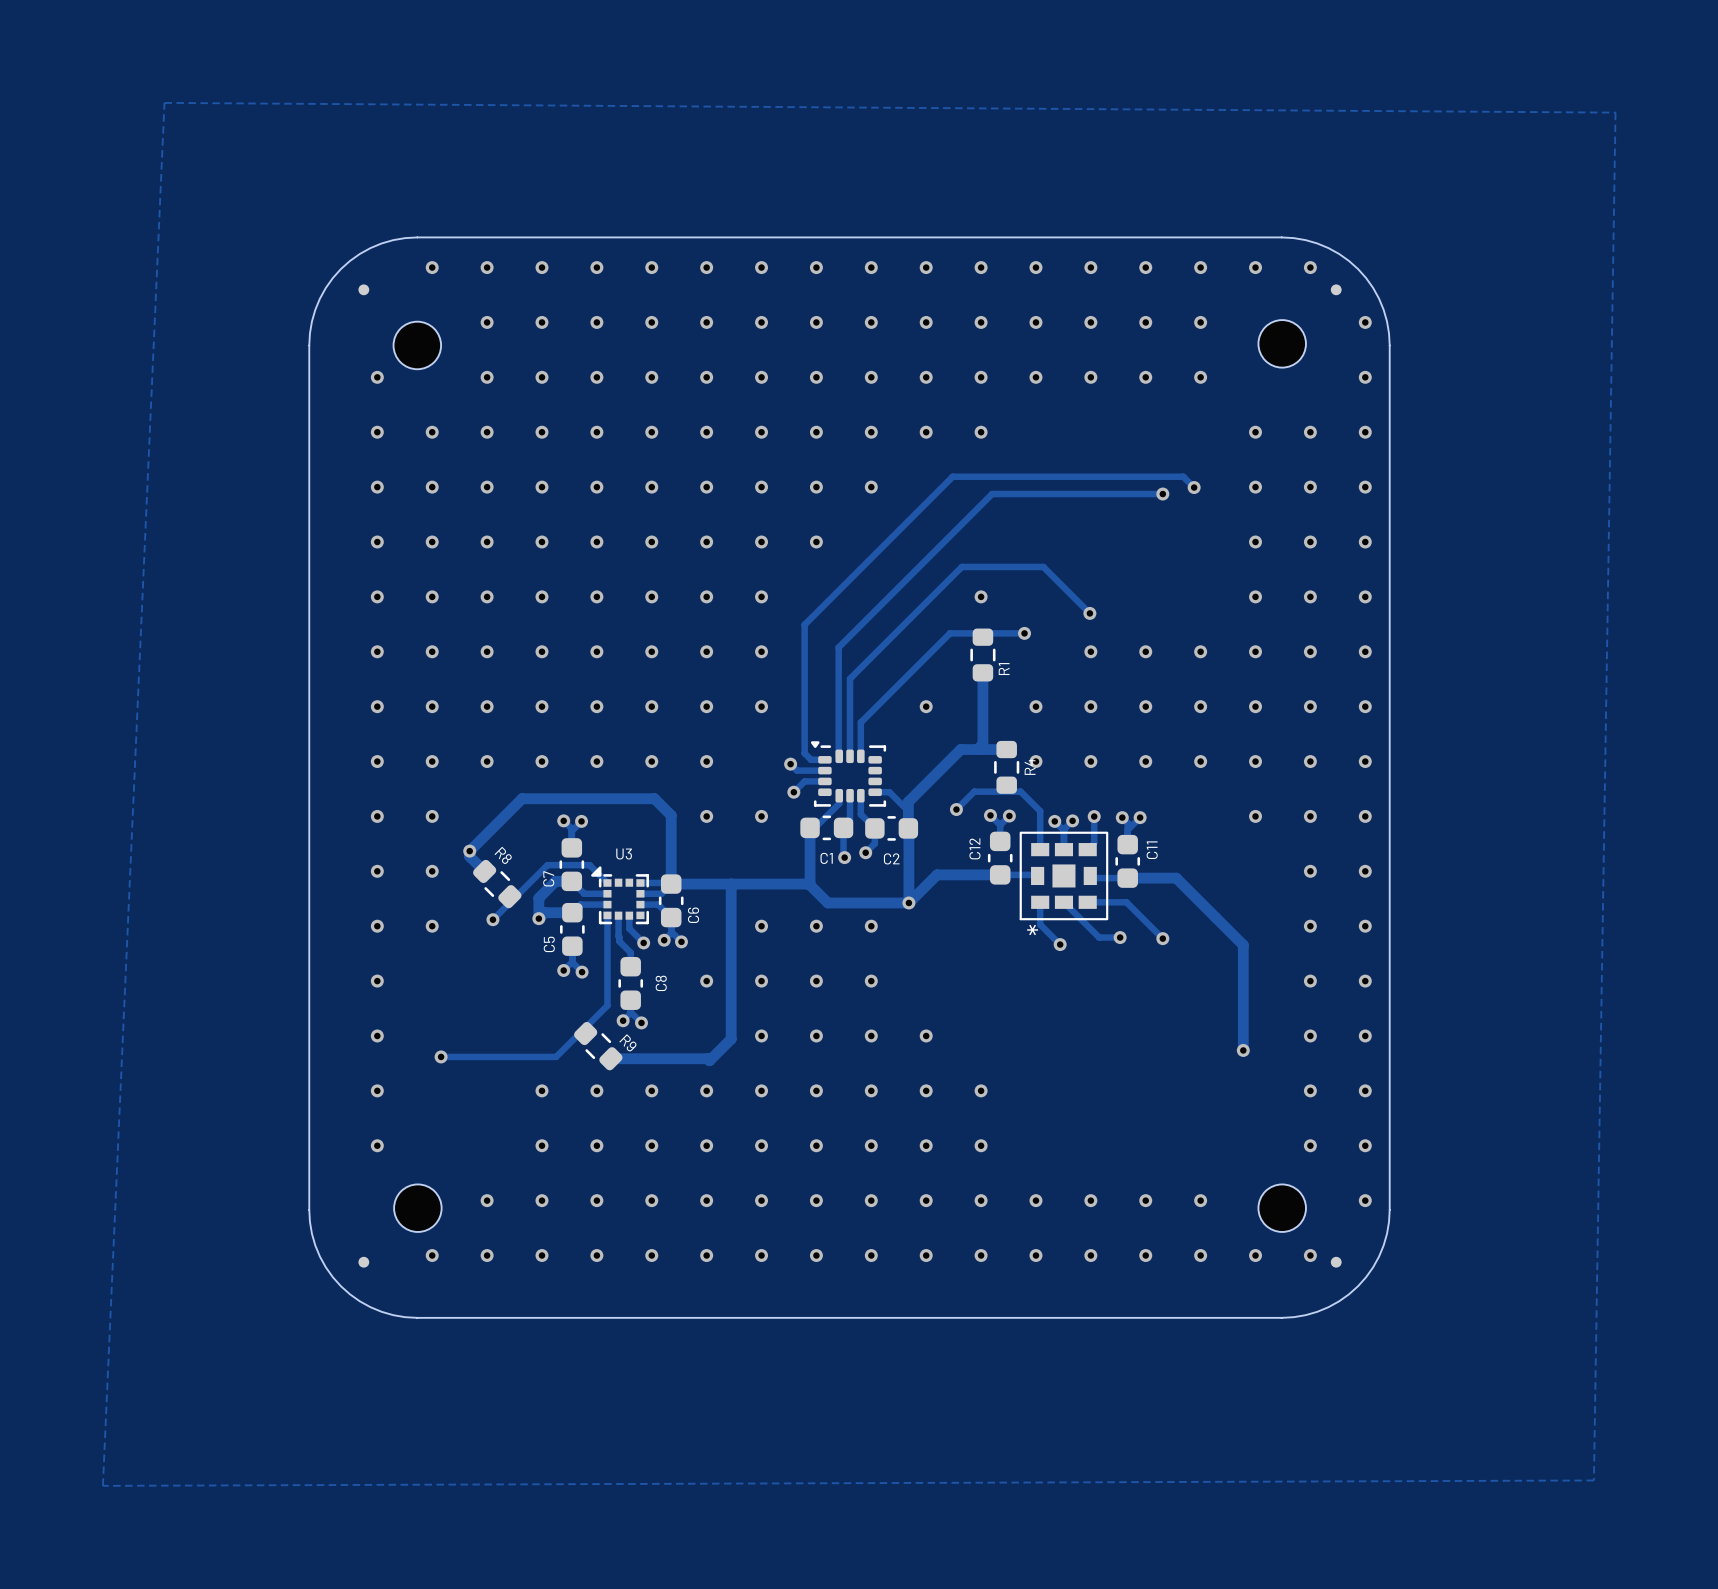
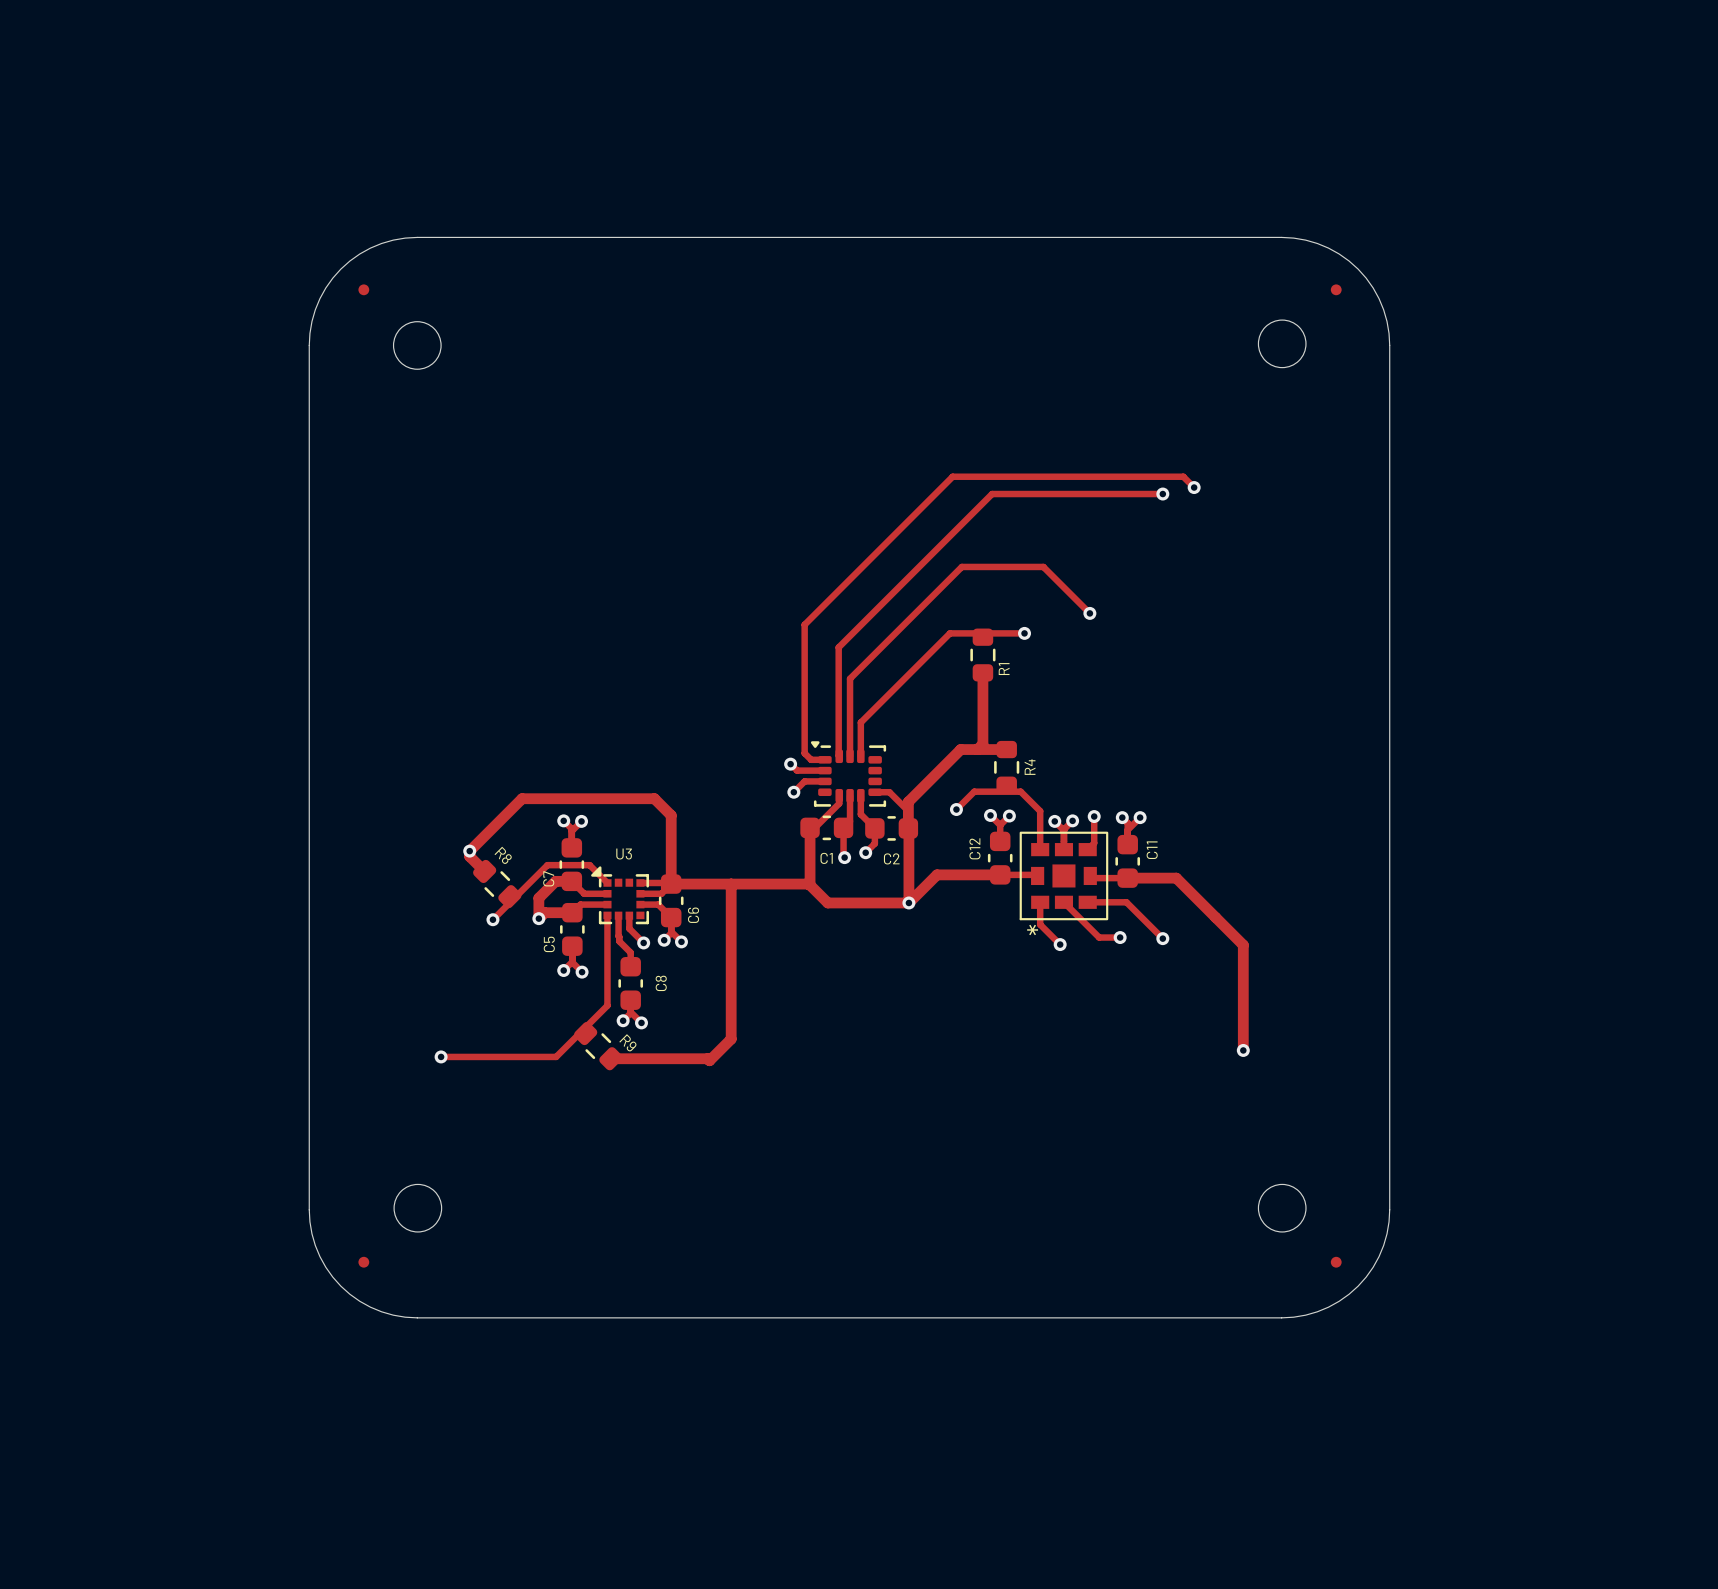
zone outline: (164, 102) (1615, 112) (1593, 1480) (102, 1485) (164, 102) -> none
via: (432, 267) -> none
via: (487, 267) -> none
via: (541, 267) -> none
via: (596, 267) -> none
via: (651, 267) -> none
via: (706, 267) -> none
via: (761, 267) -> none
via: (816, 267) -> none
via: (871, 267) -> none
via: (926, 267) -> none
via: (981, 267) -> none
via: (1035, 267) -> none
via: (1090, 267) -> none
via: (1145, 267) -> none
via: (1200, 267) -> none
via: (1255, 267) -> none
via: (1310, 267) -> none
via: (487, 322) -> none
via: (541, 322) -> none
via: (596, 322) -> none
via: (651, 322) -> none
via: (706, 322) -> none
via: (761, 322) -> none
via: (816, 322) -> none
via: (871, 322) -> none
via: (926, 322) -> none
via: (981, 322) -> none
via: (1035, 322) -> none
via: (1090, 322) -> none
via: (1145, 322) -> none
via: (1200, 322) -> none
via: (1365, 322) -> none
via: (377, 377) -> none
via: (487, 377) -> none
via: (541, 377) -> none
via: (596, 377) -> none
via: (651, 377) -> none
via: (706, 377) -> none
via: (761, 377) -> none
via: (816, 377) -> none
via: (871, 377) -> none
via: (926, 377) -> none
via: (981, 377) -> none
via: (1035, 377) -> none
via: (1090, 377) -> none
via: (1145, 377) -> none
via: (1200, 377) -> none
via: (1365, 377) -> none
via: (377, 432) -> none
via: (432, 432) -> none
via: (487, 432) -> none
via: (541, 432) -> none
via: (596, 432) -> none
via: (651, 432) -> none
via: (706, 432) -> none
via: (761, 432) -> none
via: (816, 432) -> none
via: (871, 432) -> none
via: (926, 432) -> none
via: (981, 432) -> none
via: (1255, 432) -> none
via: (1310, 432) -> none
via: (1365, 432) -> none
via: (377, 487) -> none
via: (432, 487) -> none
via: (487, 487) -> none
via: (541, 487) -> none
via: (596, 487) -> none
via: (651, 487) -> none
via: (706, 487) -> none
via: (761, 487) -> none
via: (816, 487) -> none
via: (871, 487) -> none
via: (1255, 487) -> none
via: (1310, 487) -> none
via: (1365, 487) -> none
via: (377, 541) -> none
via: (432, 541) -> none
via: (487, 541) -> none
via: (541, 541) -> none
via: (596, 541) -> none
via: (651, 541) -> none
via: (706, 541) -> none
via: (761, 541) -> none
via: (816, 541) -> none
via: (1255, 541) -> none
via: (1310, 541) -> none
via: (1365, 541) -> none
via: (377, 596) -> none
via: (432, 596) -> none
via: (487, 596) -> none
via: (541, 596) -> none
via: (596, 596) -> none
via: (651, 596) -> none
via: (706, 596) -> none
via: (761, 596) -> none
via: (981, 596) -> none
via: (1255, 596) -> none
via: (1310, 596) -> none
via: (1365, 596) -> none
via: (377, 651) -> none
via: (432, 651) -> none
via: (487, 651) -> none
via: (541, 651) -> none
via: (596, 651) -> none
via: (651, 651) -> none
via: (706, 651) -> none
via: (761, 651) -> none
via: (1090, 651) -> none
via: (1145, 651) -> none
via: (1200, 651) -> none
via: (1255, 651) -> none
via: (1310, 651) -> none
via: (1365, 651) -> none
via: (377, 706) -> none
via: (432, 706) -> none
via: (487, 706) -> none
via: (541, 706) -> none
via: (596, 706) -> none
via: (651, 706) -> none
via: (706, 706) -> none
via: (761, 706) -> none
via: (926, 706) -> none
via: (1035, 706) -> none
via: (1090, 706) -> none
via: (1145, 706) -> none
via: (1200, 706) -> none
via: (1255, 706) -> none
via: (1310, 706) -> none
via: (1365, 706) -> none
via: (377, 761) -> none
via: (432, 761) -> none
via: (487, 761) -> none
via: (541, 761) -> none
via: (596, 761) -> none
via: (651, 761) -> none
via: (706, 761) -> none
via: (1035, 761) -> none
via: (1090, 761) -> none
via: (1145, 761) -> none
via: (1200, 761) -> none
via: (1255, 761) -> none
via: (1310, 761) -> none
via: (1365, 761) -> none
via: (377, 816) -> none
via: (432, 816) -> none
via: (706, 816) -> none
via: (761, 816) -> none
via: (1255, 816) -> none
via: (1310, 816) -> none
via: (1365, 816) -> none
via: (377, 871) -> none
via: (432, 871) -> none
via: (1310, 871) -> none
via: (1365, 871) -> none
via: (377, 926) -> none
via: (432, 926) -> none
via: (761, 926) -> none
via: (816, 926) -> none
via: (871, 926) -> none
via: (1310, 926) -> none
via: (1365, 926) -> none
via: (377, 981) -> none
via: (706, 981) -> none
via: (761, 981) -> none
via: (816, 981) -> none
via: (871, 981) -> none
via: (1310, 981) -> none
via: (1365, 981) -> none
via: (377, 1035) -> none
via: (761, 1035) -> none
via: (816, 1035) -> none
via: (871, 1035) -> none
via: (926, 1035) -> none
via: (1310, 1035) -> none
via: (1365, 1035) -> none
via: (377, 1090) -> none
via: (541, 1090) -> none
via: (596, 1090) -> none
via: (651, 1090) -> none
via: (706, 1090) -> none
via: (761, 1090) -> none
via: (816, 1090) -> none
via: (871, 1090) -> none
via: (926, 1090) -> none
via: (981, 1090) -> none
via: (1310, 1090) -> none
via: (1365, 1090) -> none
via: (377, 1145) -> none
via: (541, 1145) -> none
via: (596, 1145) -> none
via: (651, 1145) -> none
via: (706, 1145) -> none
via: (761, 1145) -> none
via: (816, 1145) -> none
via: (871, 1145) -> none
via: (926, 1145) -> none
via: (981, 1145) -> none
via: (1310, 1145) -> none
via: (1365, 1145) -> none
via: (487, 1200) -> none
via: (541, 1200) -> none
via: (596, 1200) -> none
via: (651, 1200) -> none
via: (706, 1200) -> none
via: (761, 1200) -> none
via: (816, 1200) -> none
via: (871, 1200) -> none
via: (926, 1200) -> none
via: (981, 1200) -> none
via: (1035, 1200) -> none
via: (1090, 1200) -> none
via: (1145, 1200) -> none
via: (1200, 1200) -> none
via: (1365, 1200) -> none
via: (432, 1255) -> none
via: (487, 1255) -> none
via: (541, 1255) -> none
via: (596, 1255) -> none
via: (651, 1255) -> none
via: (706, 1255) -> none
via: (761, 1255) -> none
via: (816, 1255) -> none
via: (871, 1255) -> none
via: (926, 1255) -> none
via: (981, 1255) -> none
via: (1035, 1255) -> none
via: (1090, 1255) -> none
via: (1145, 1255) -> none
via: (1200, 1255) -> none
via: (1255, 1255) -> none
via: (1310, 1255) -> none

